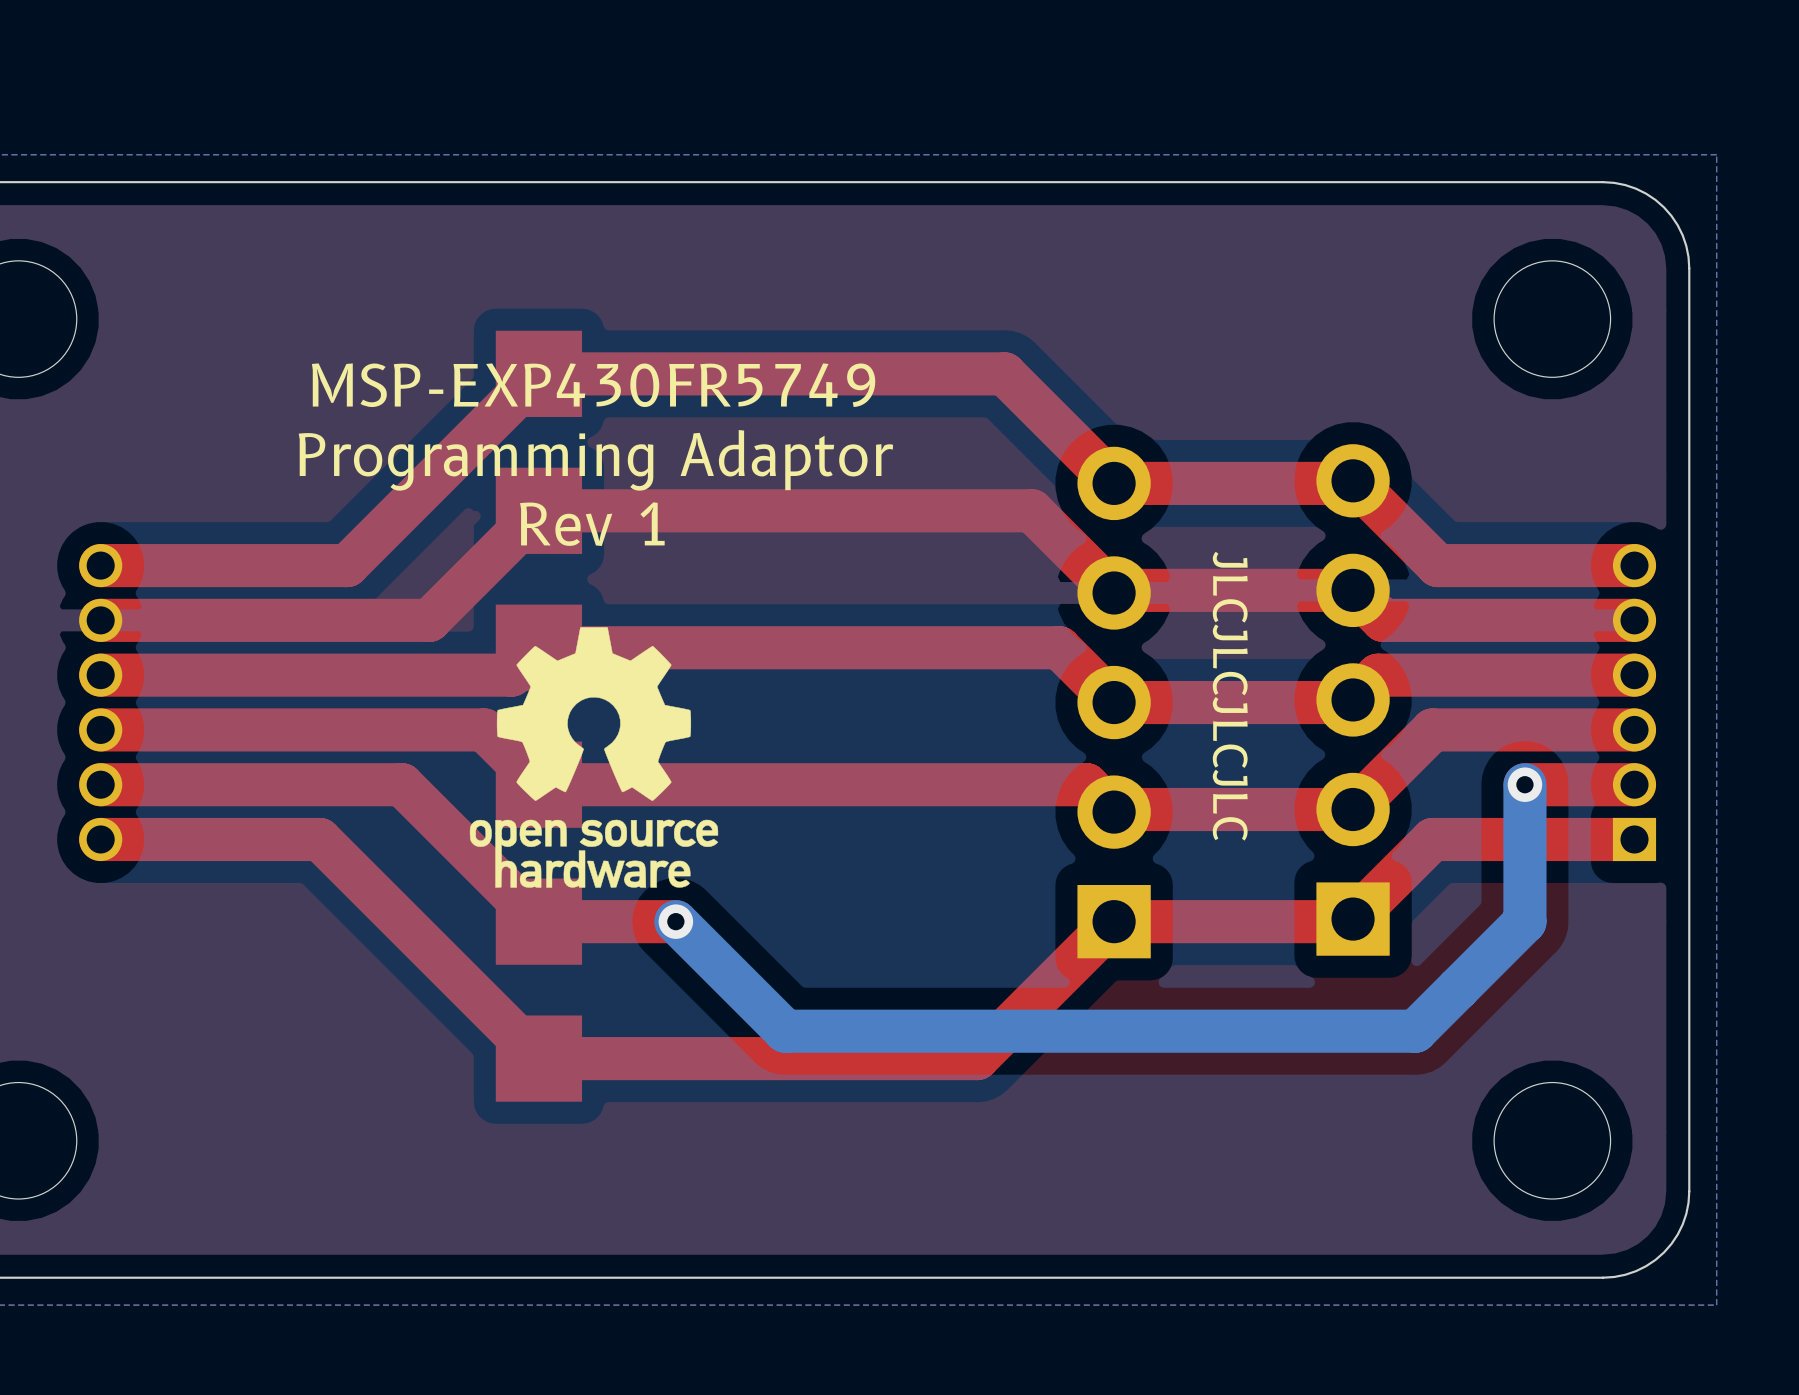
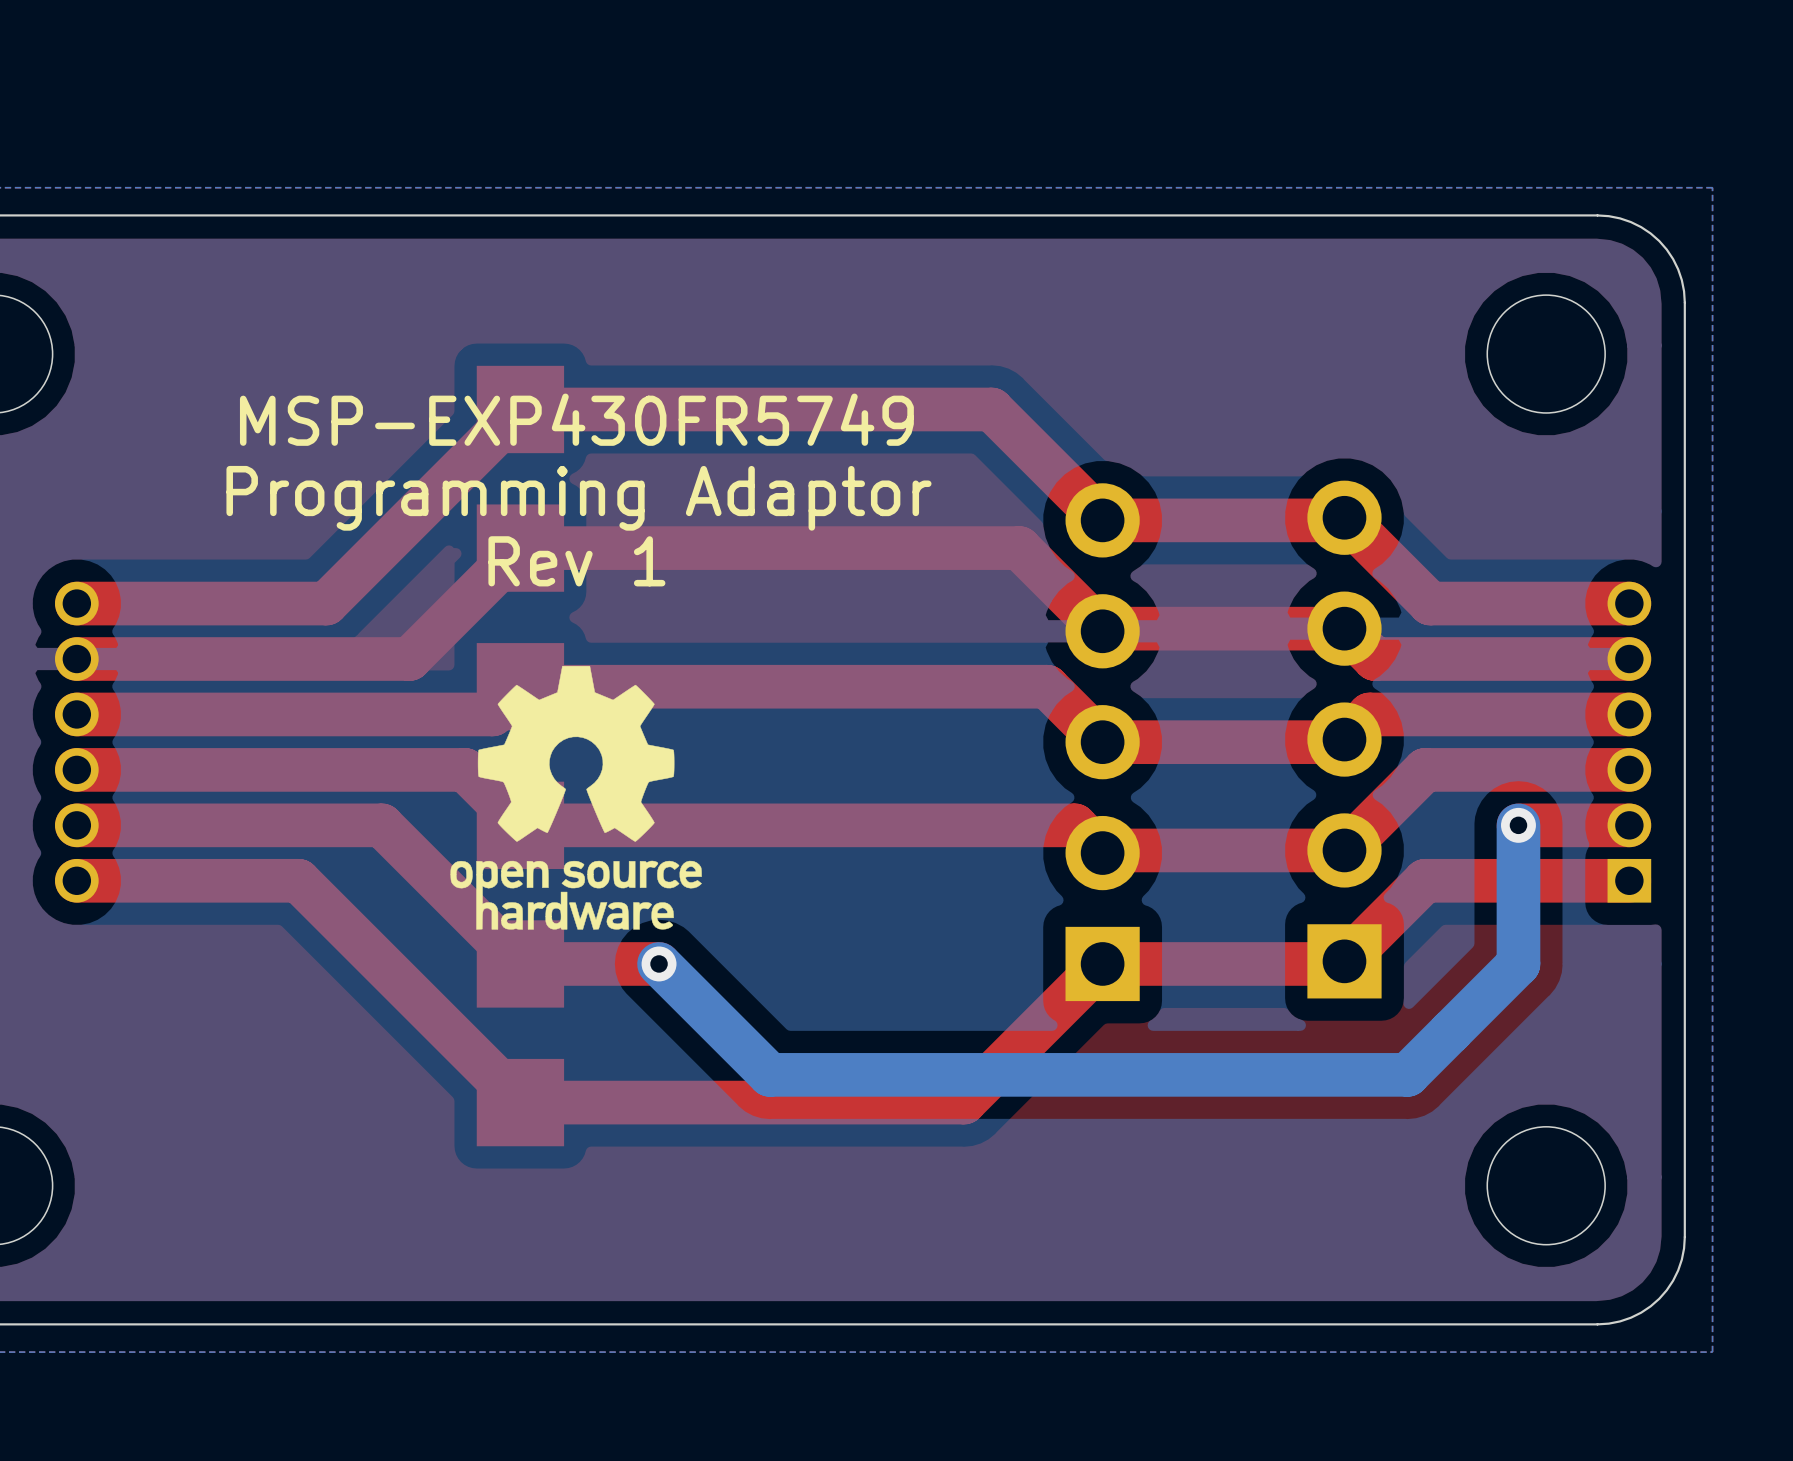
text: JLCJLCJLCJLC (1230, 696) -> none

